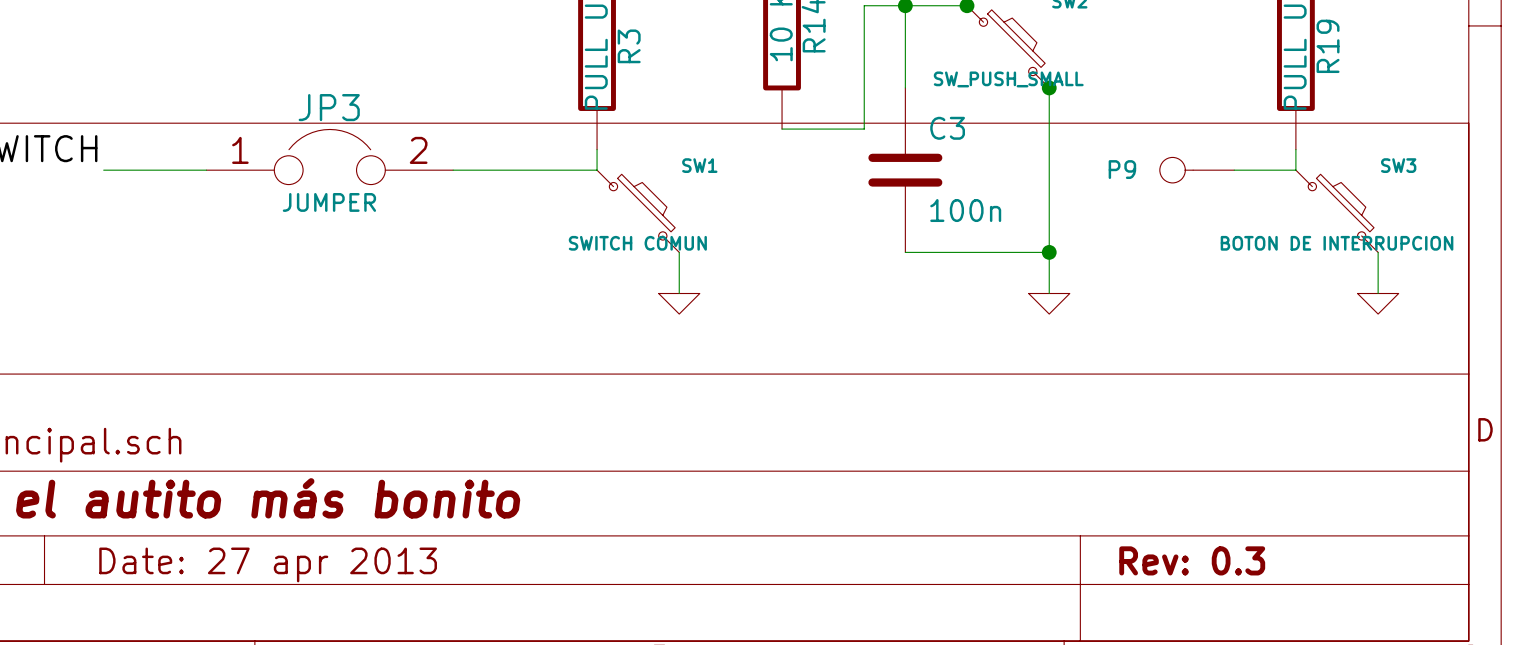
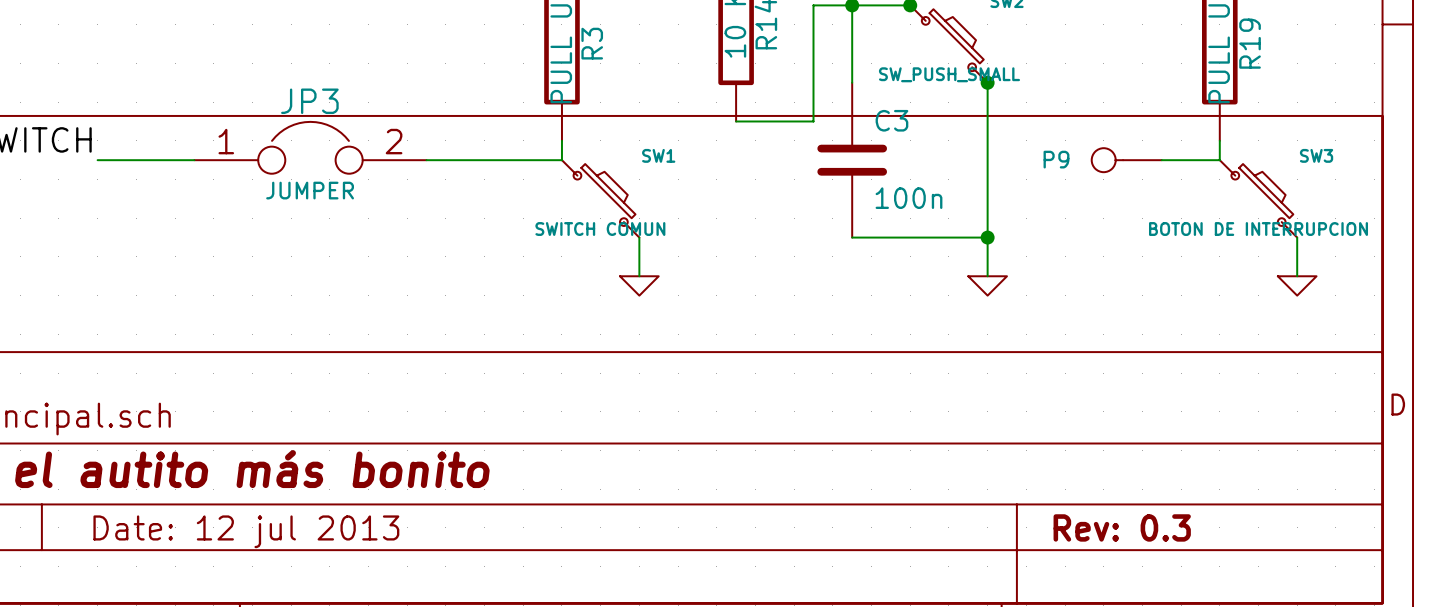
title block: Date: 27 apr 2013 (268, 564) -> Date: 12 jul 2013 (246, 531)

